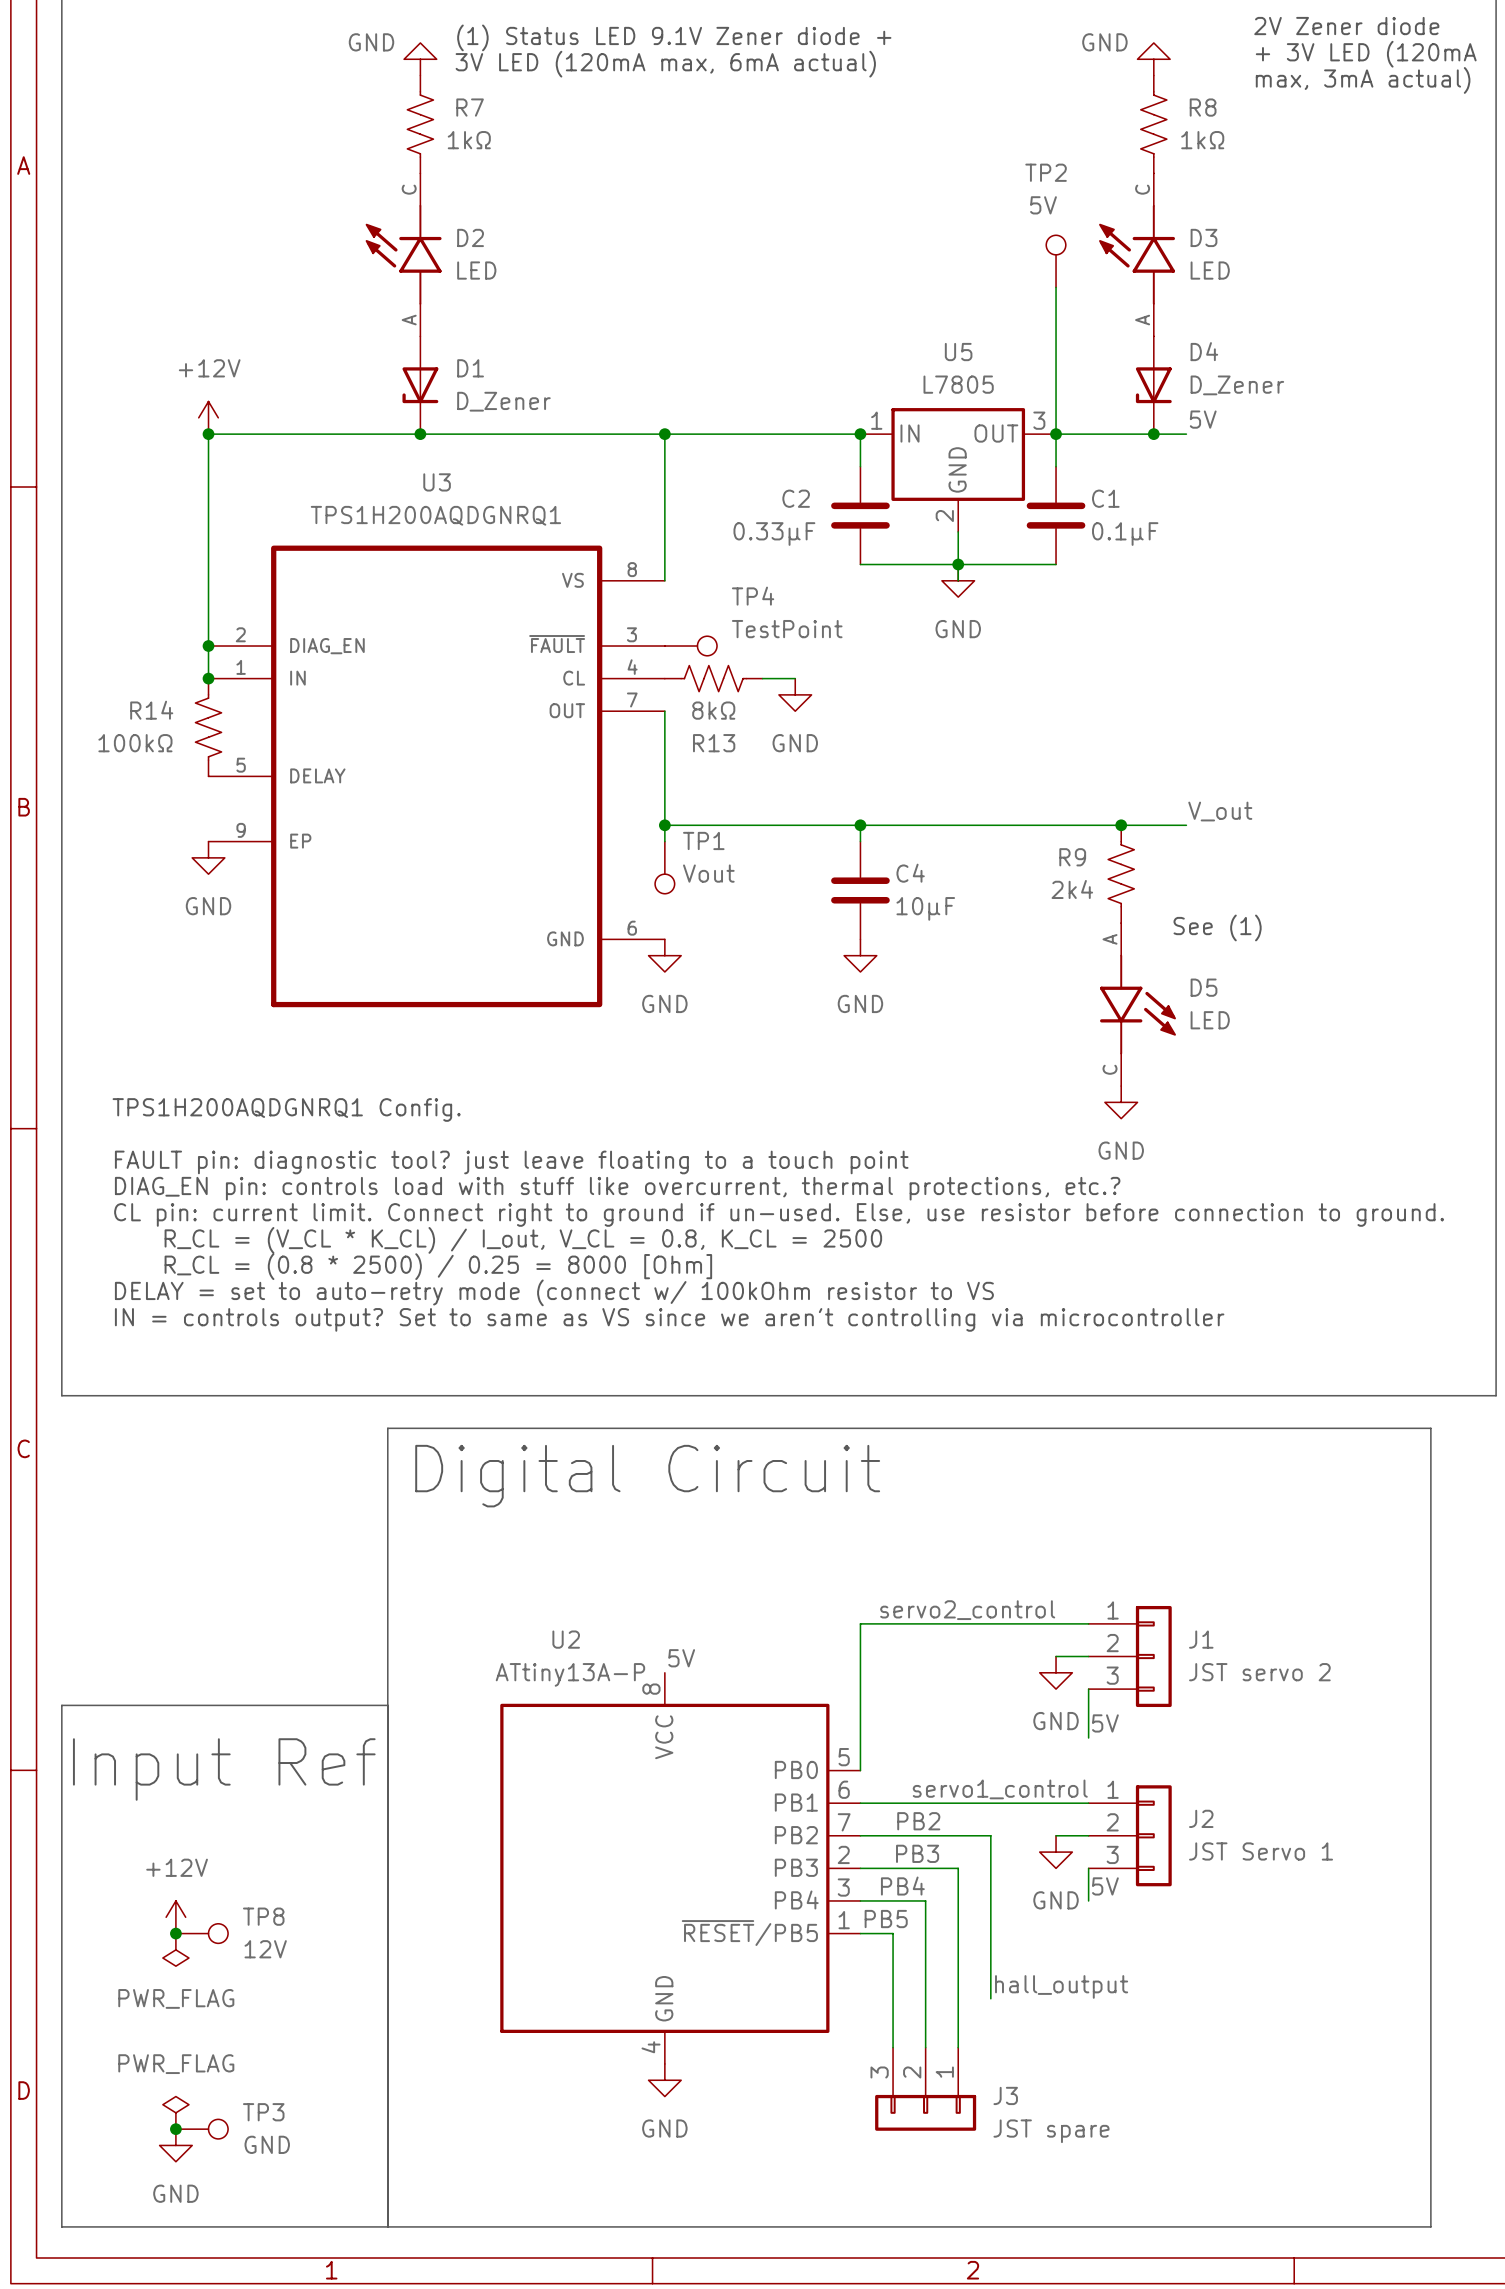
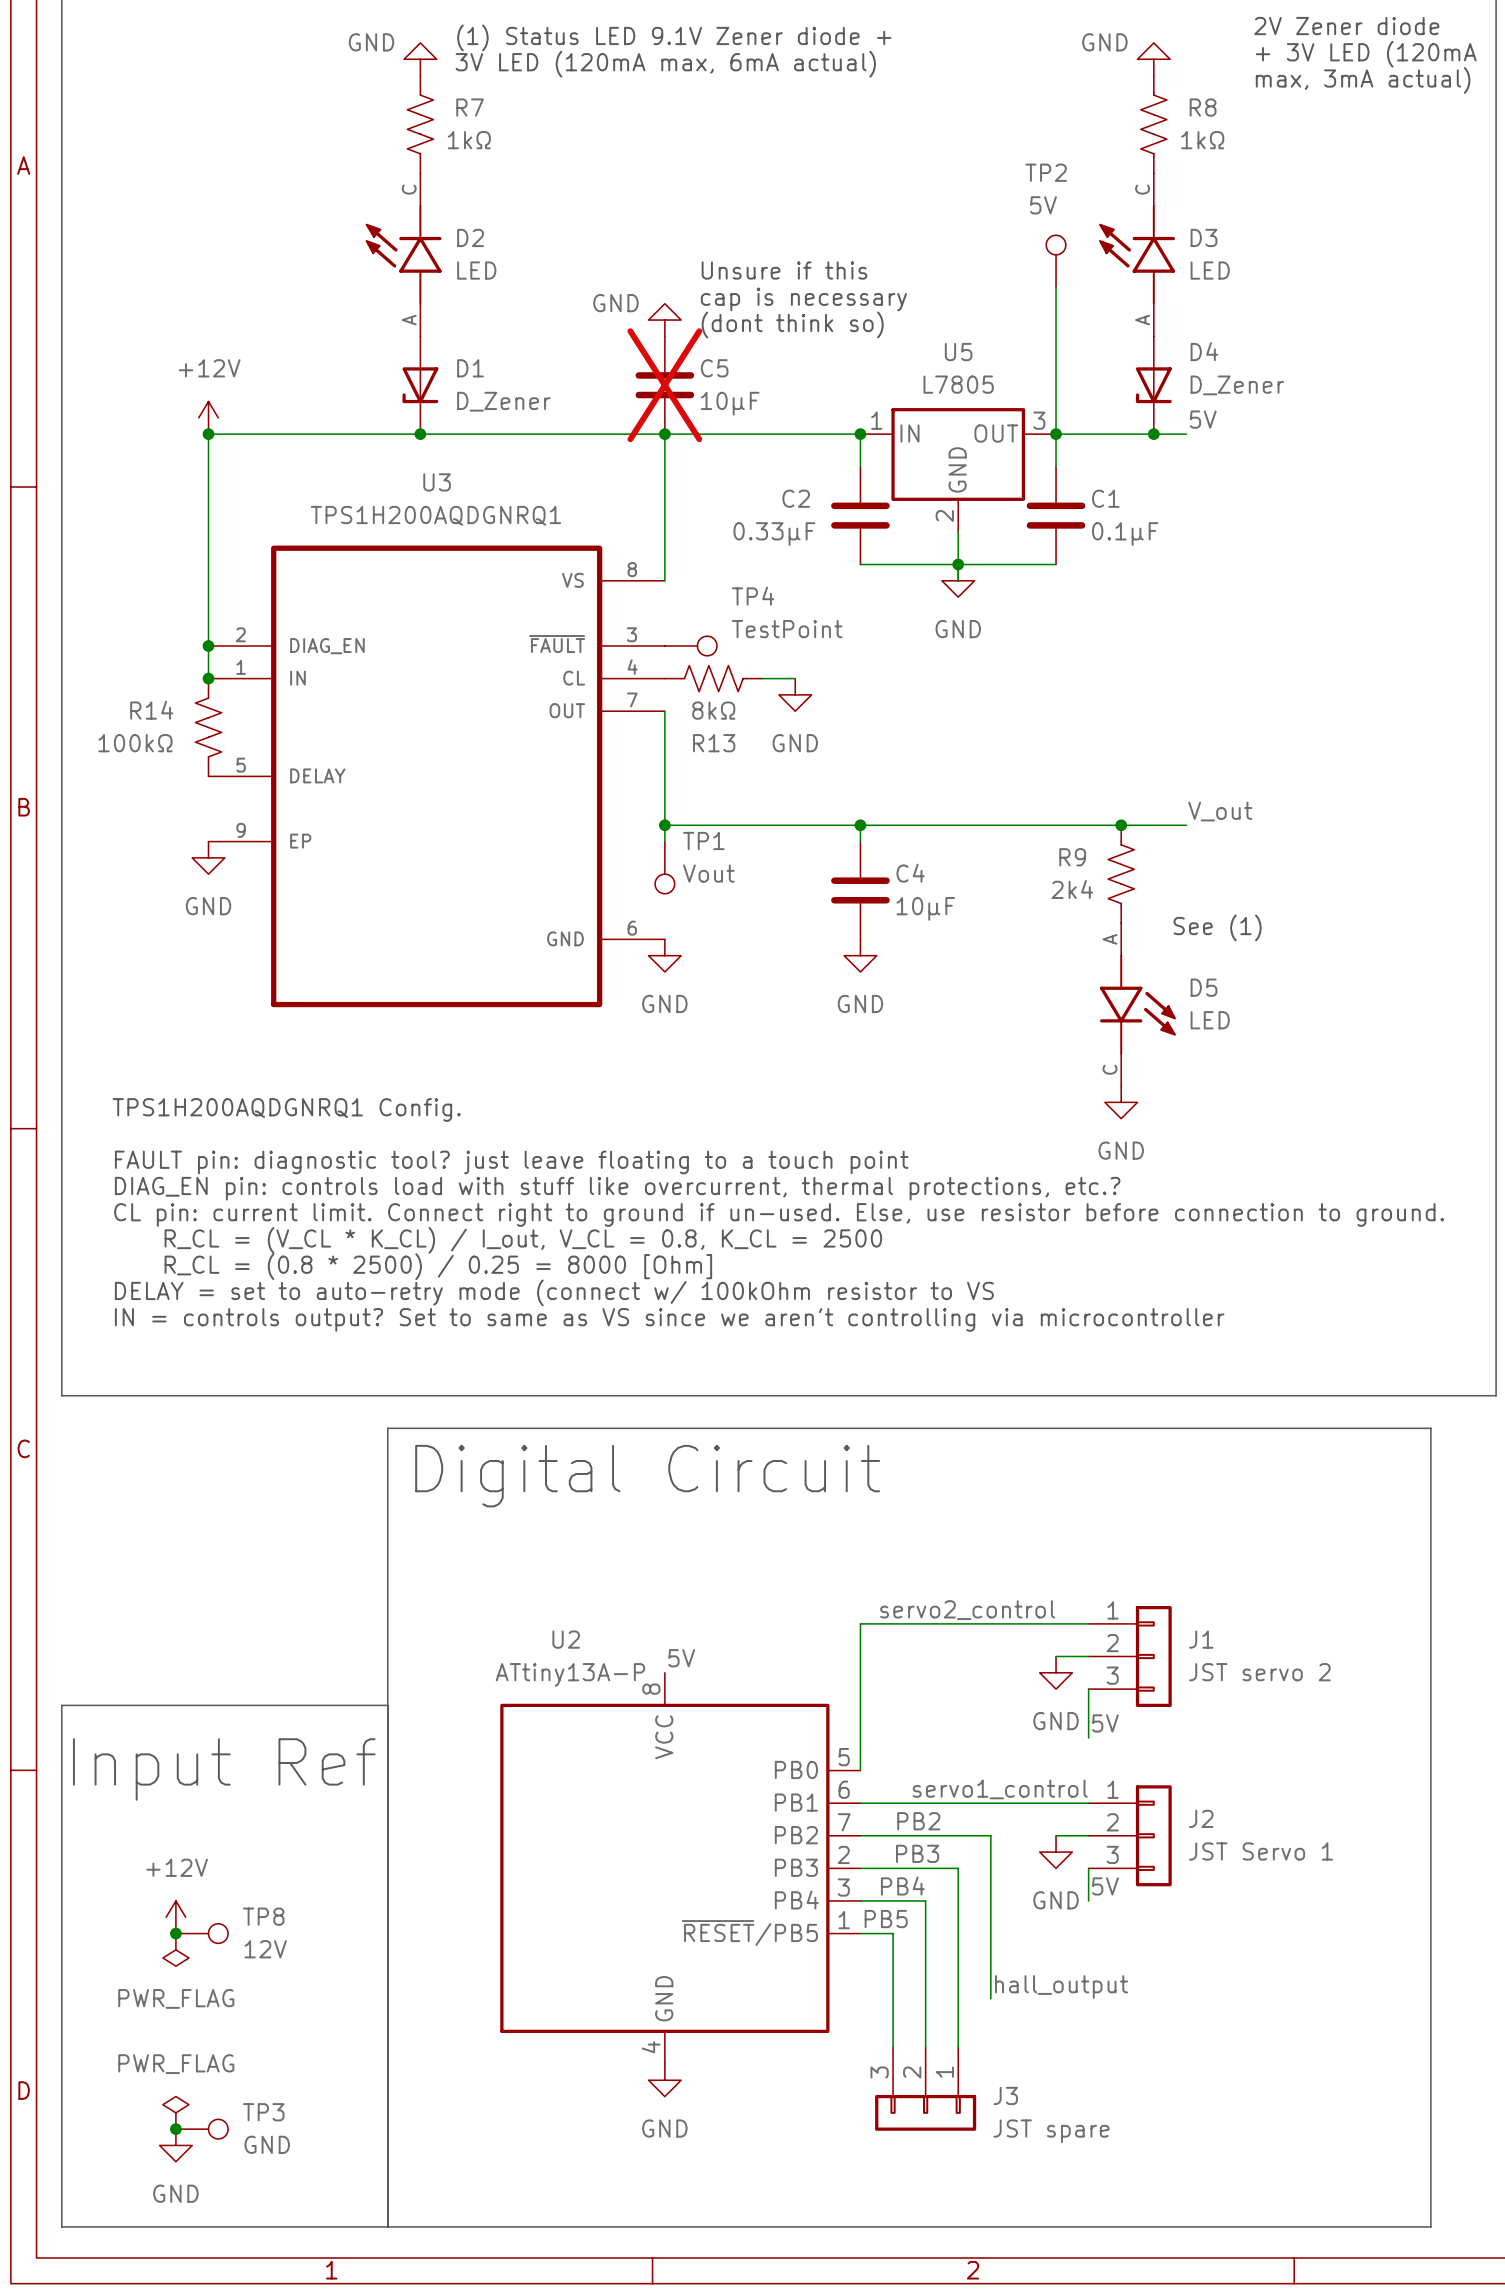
text: none -> Unsure if this (784, 270)
text: none -> cap is necessary (803, 299)
power symbol: none -> GND (664, 320)
text: none -> (dont think so) (792, 324)
C5: none -> 10µF (664, 385)

